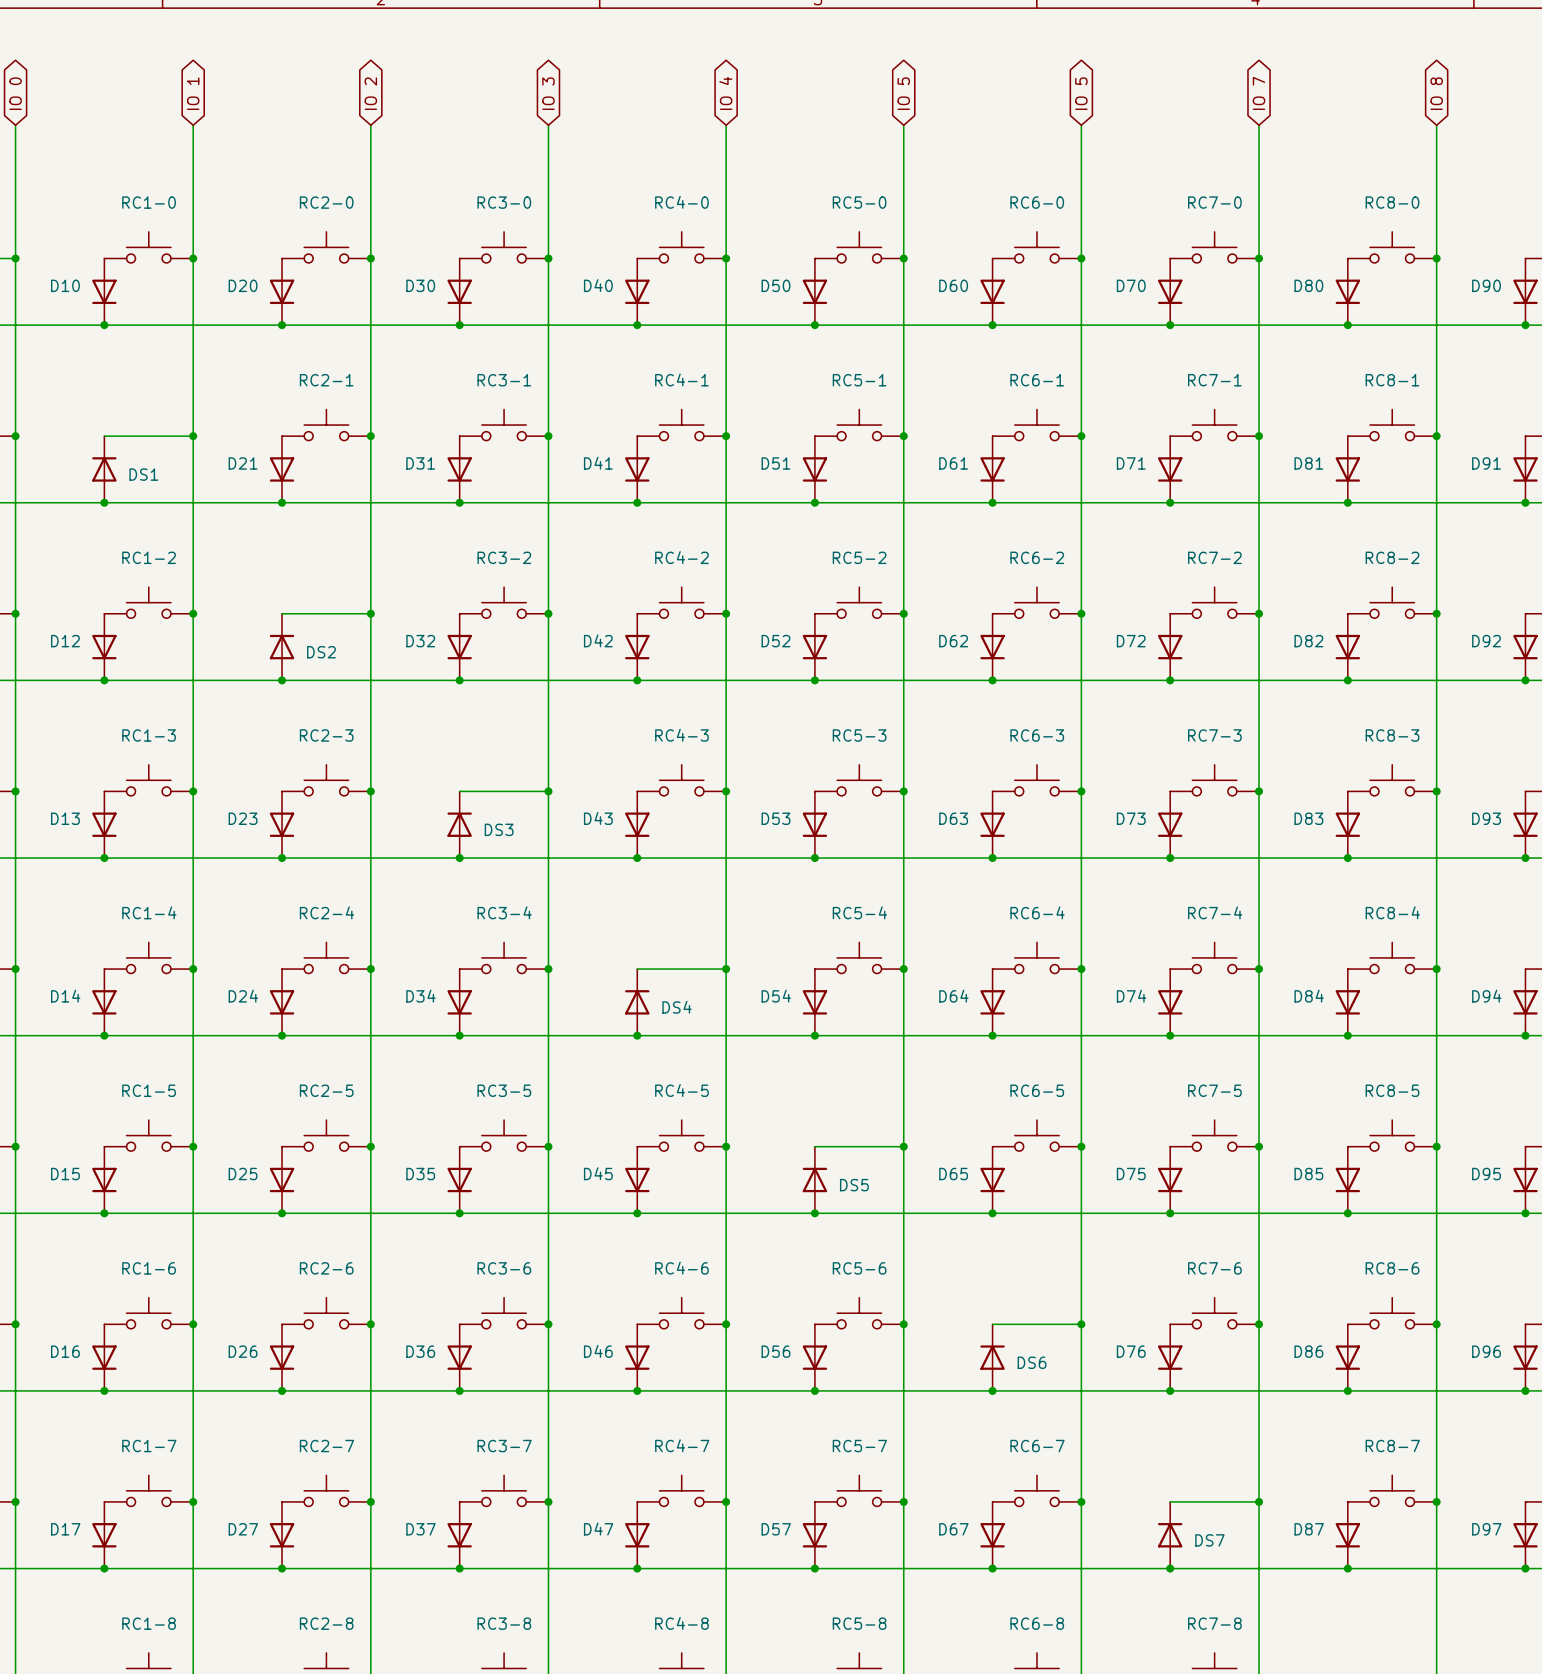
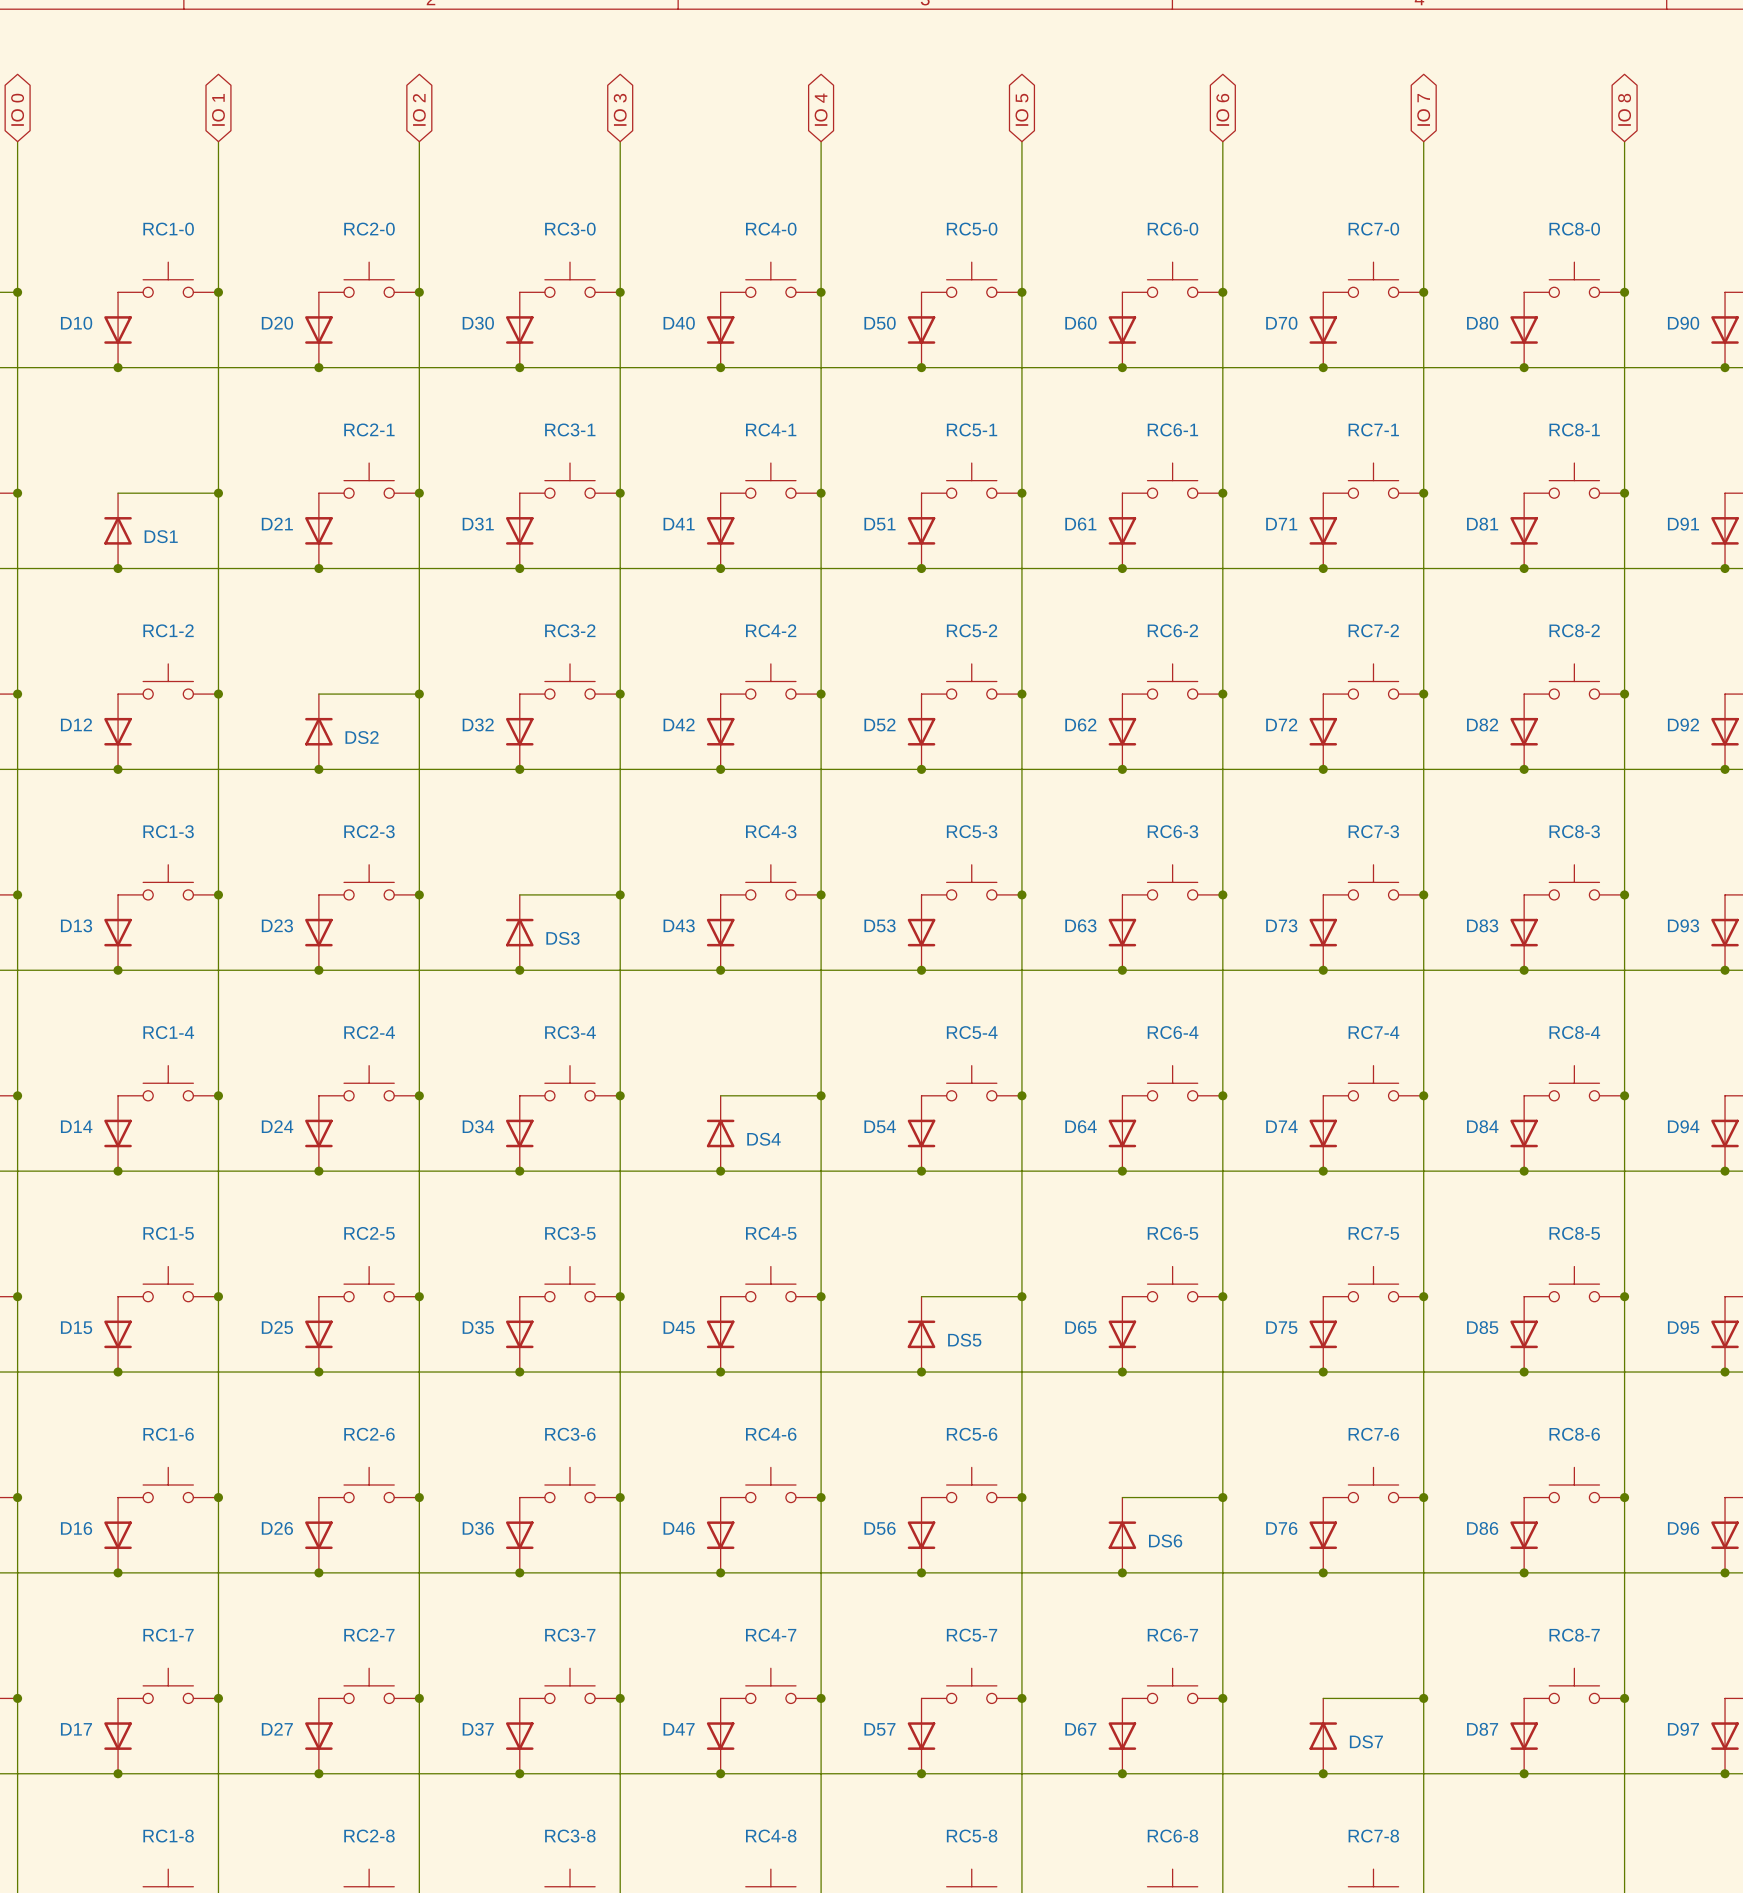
global label: IO 5 (1081, 93) -> IO 6 (1222, 109)

